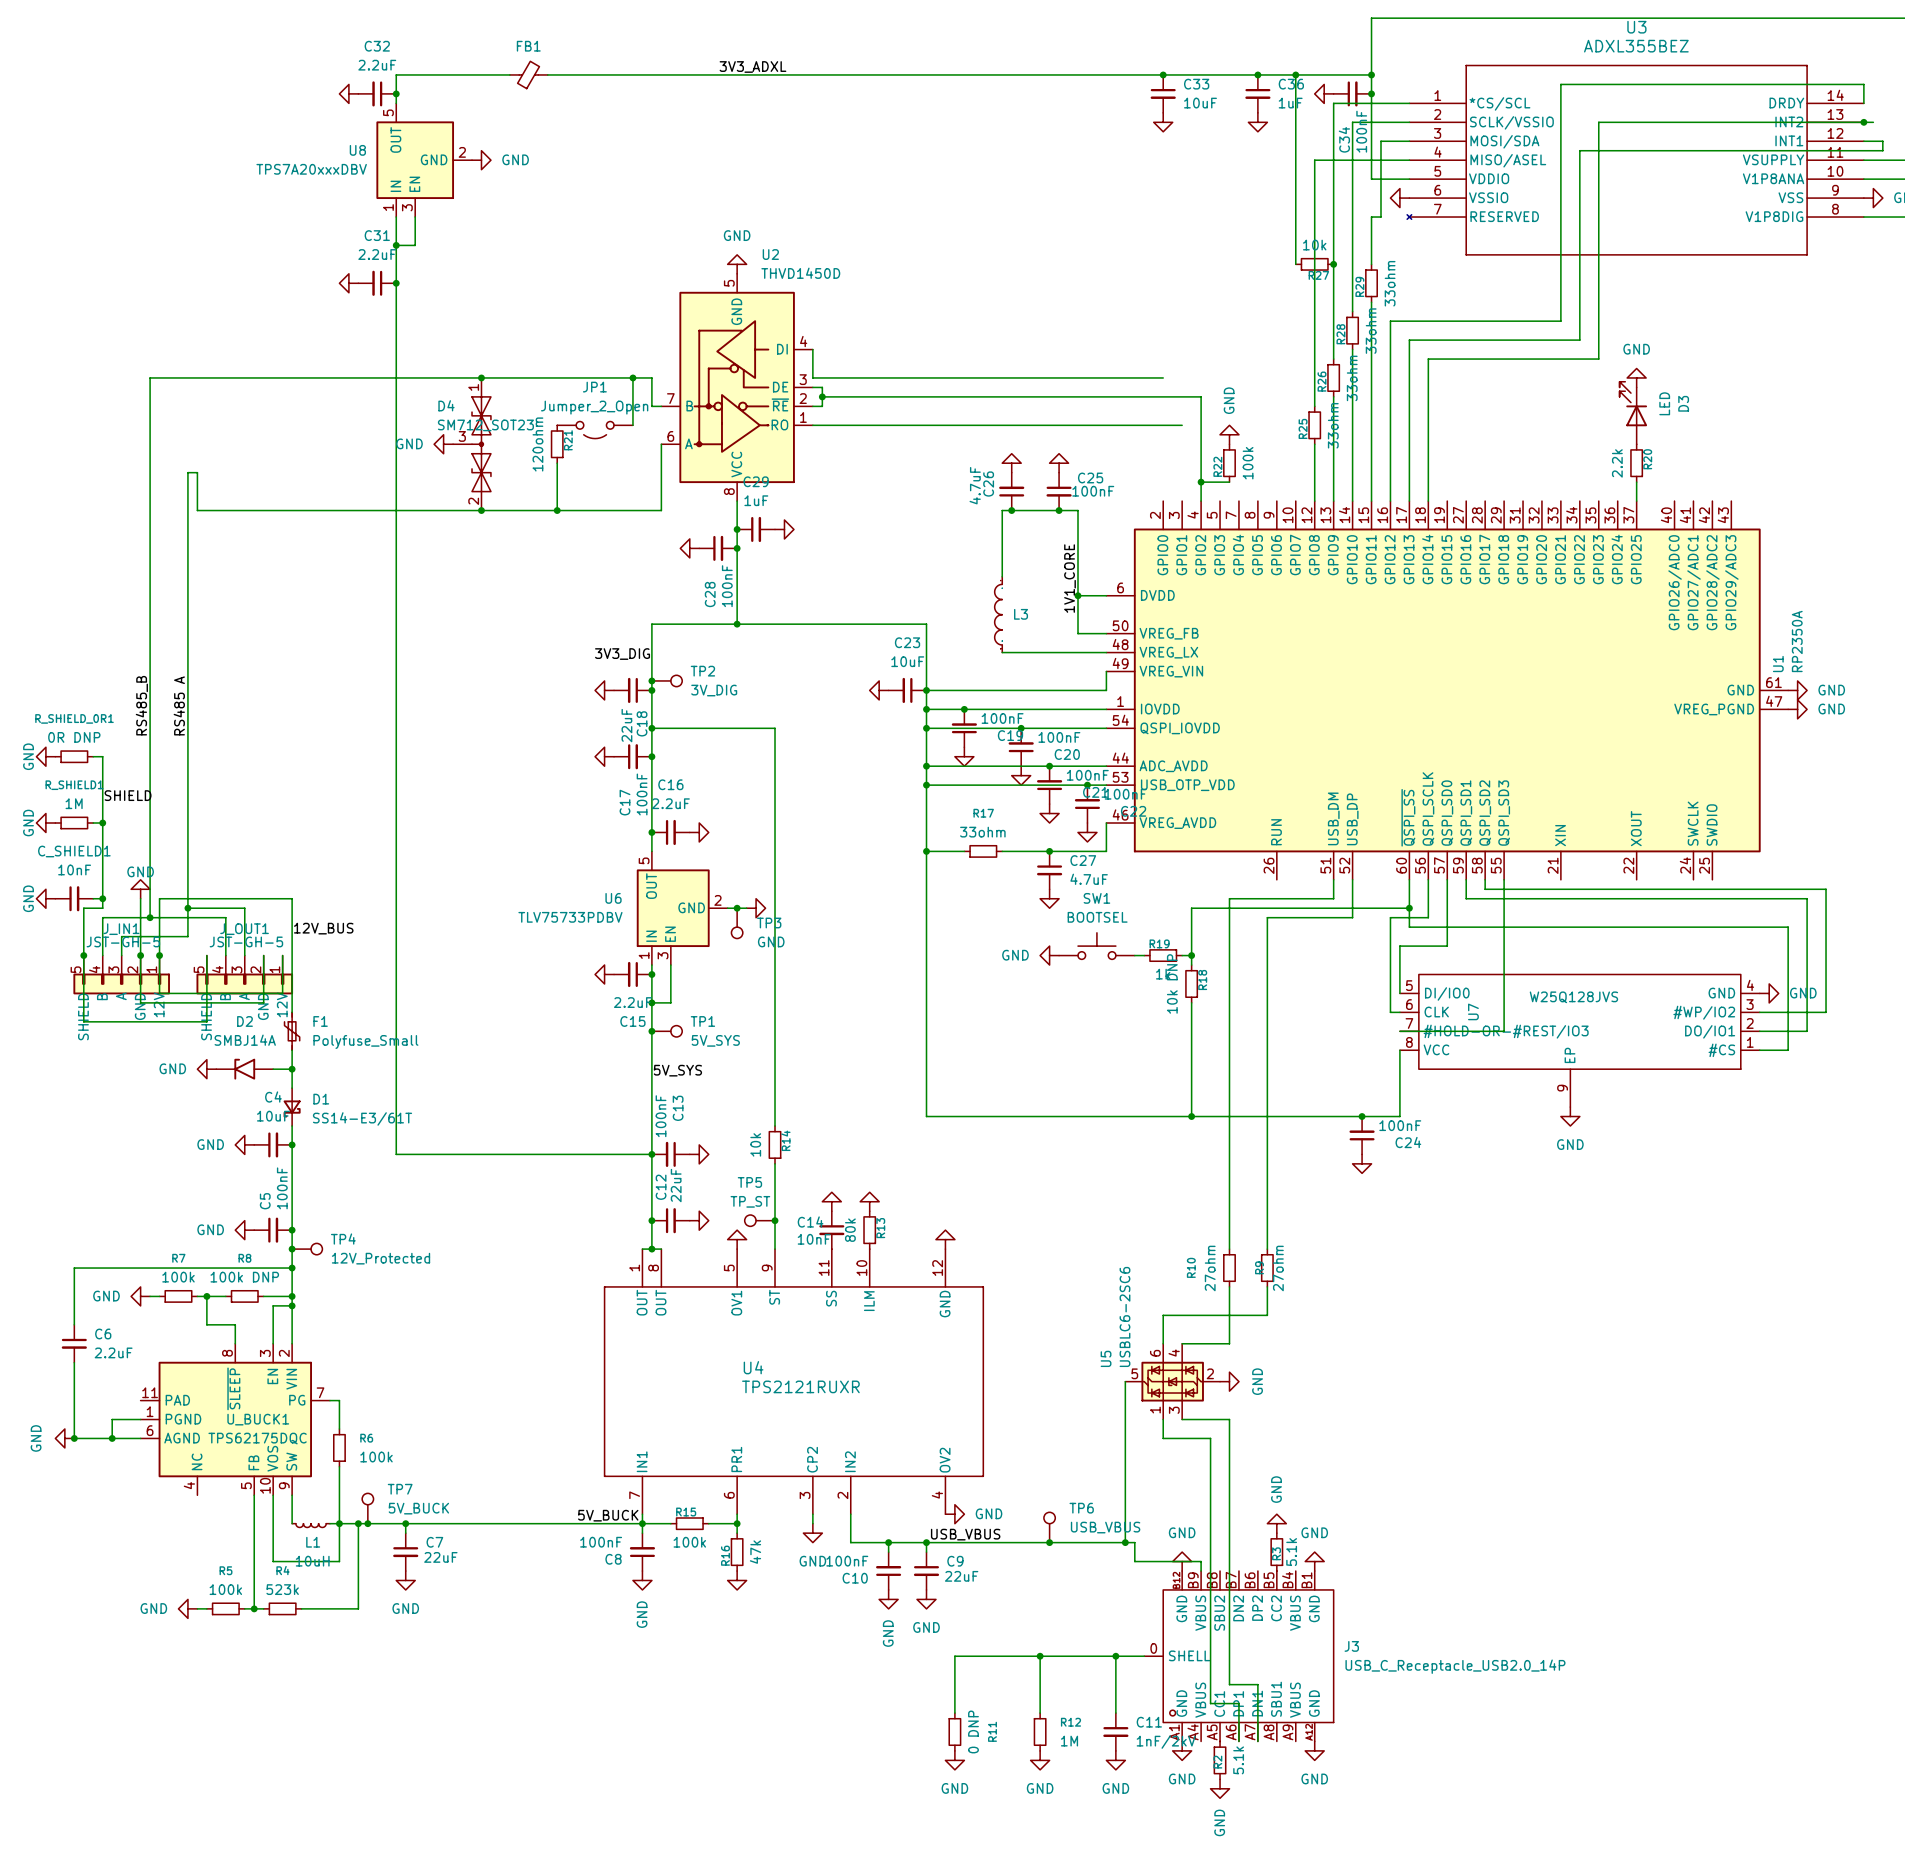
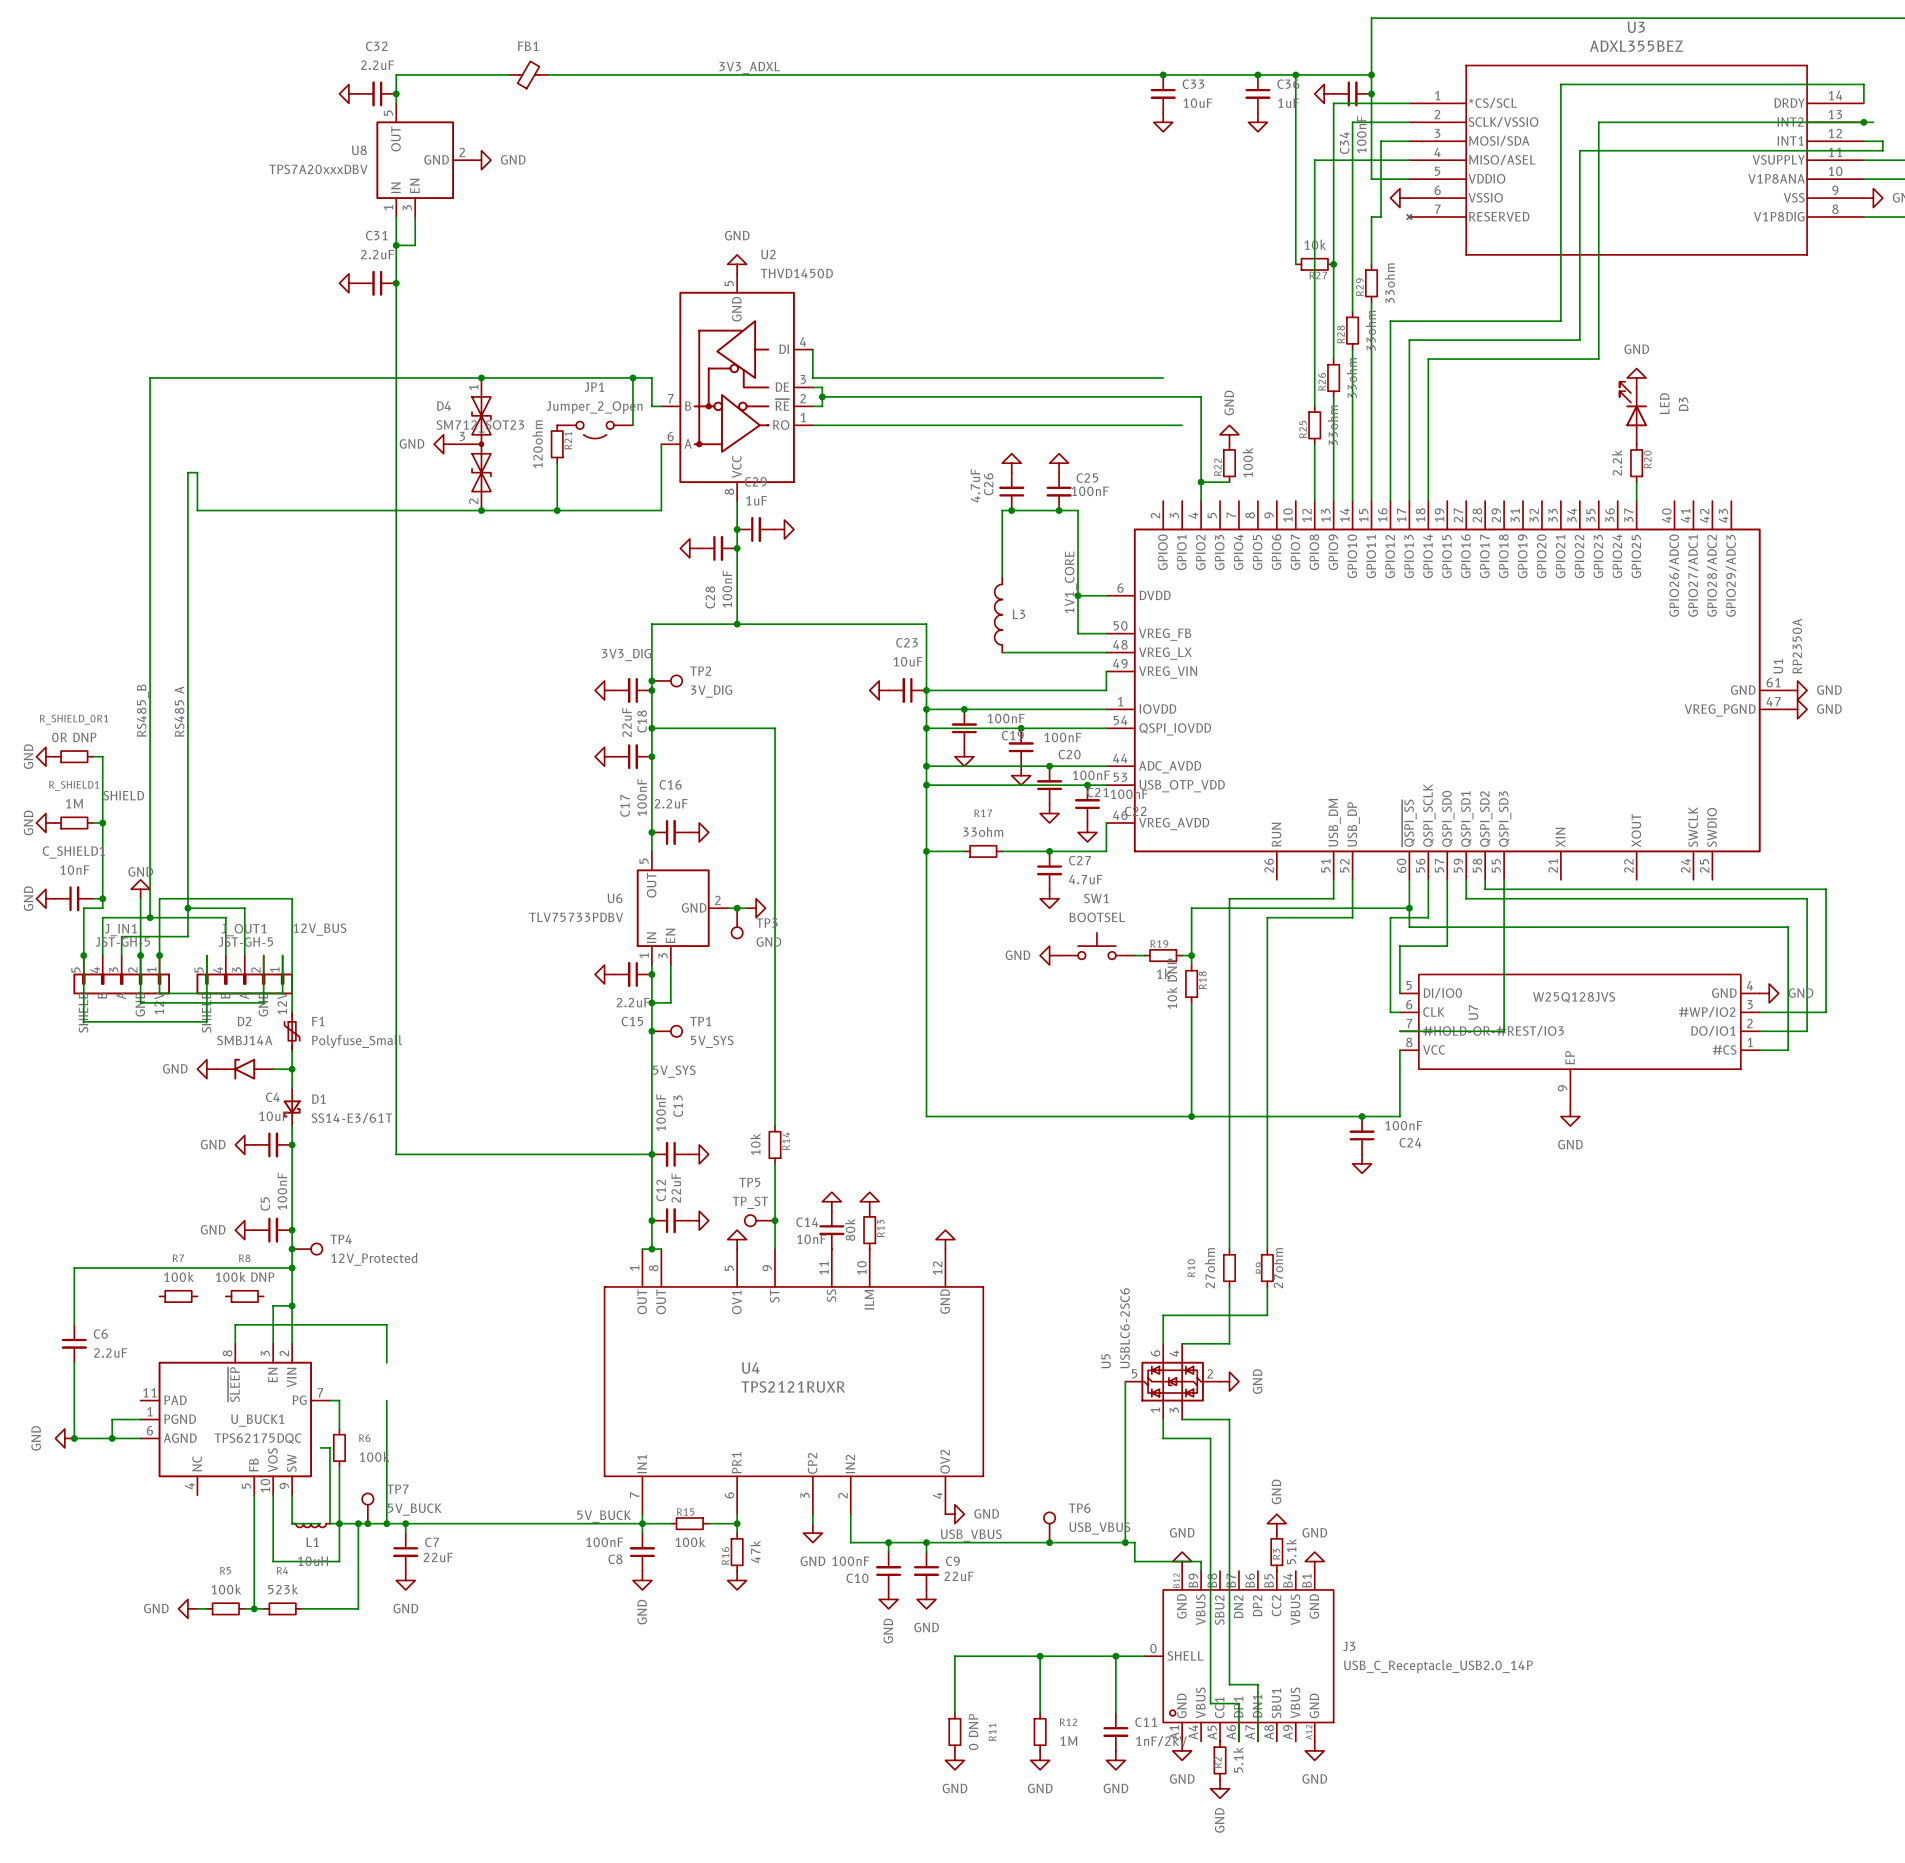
power symbol: GND (140, 1296) -> none
wire: (150, 1296) (159, 1296) -> none
wire: (197, 1296) (225, 1296) -> none
wire: (206, 1296) (206, 1324) (235, 1324) -> (386, 1362) (386, 1324) (235, 1324)
junction: (206, 1296) -> none
wire: (263, 1296) (292, 1296) -> none
junction: (292, 1296) -> none
wire: none -> (386, 1400) (386, 1523)
wire: none -> (320, 1447) (329, 1447) (329, 1523)
wire: none -> (292, 1523) (320, 1523)
junction: none -> (386, 1523)

